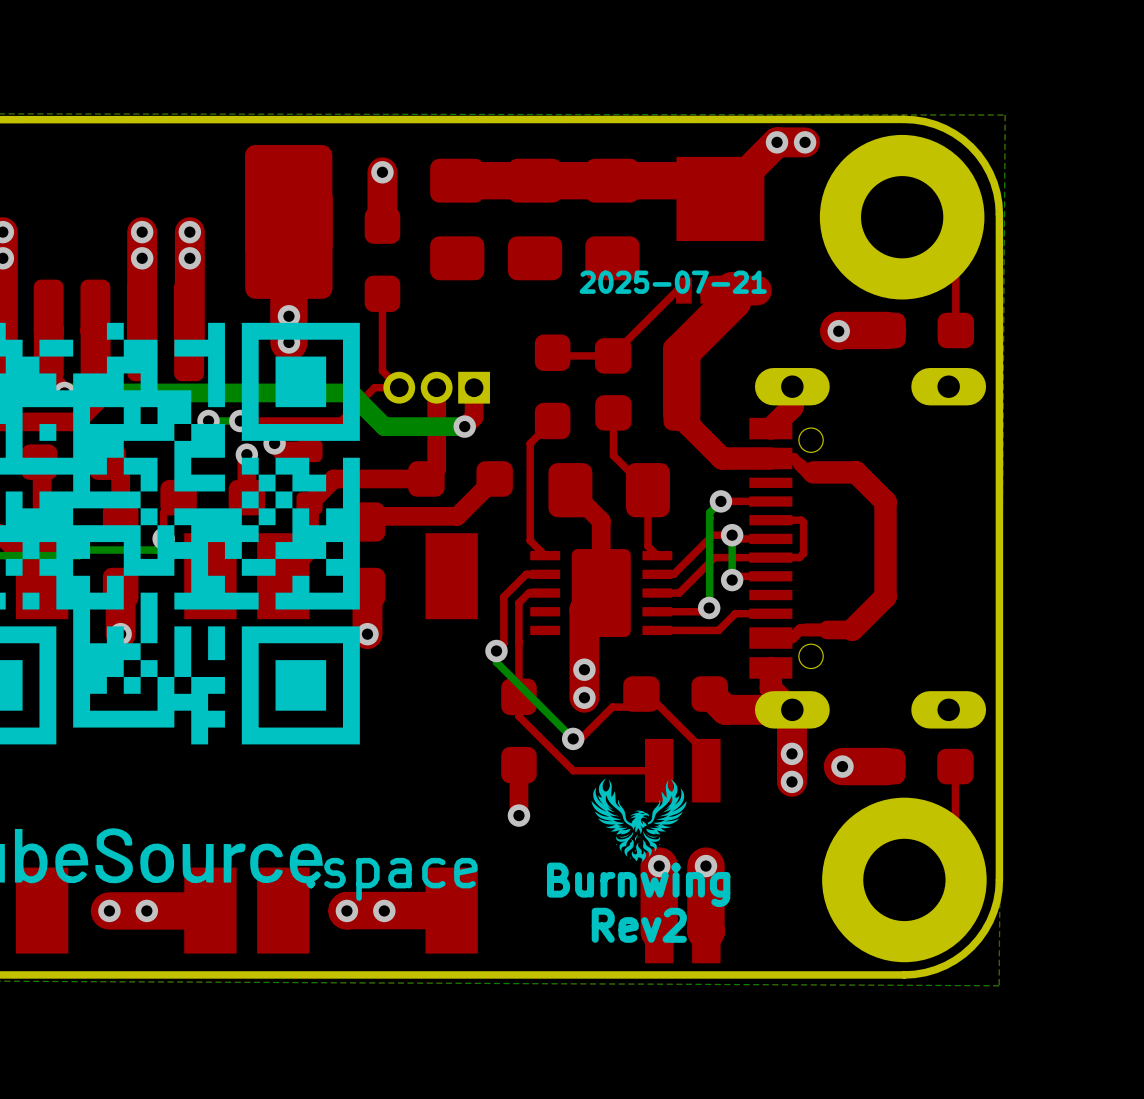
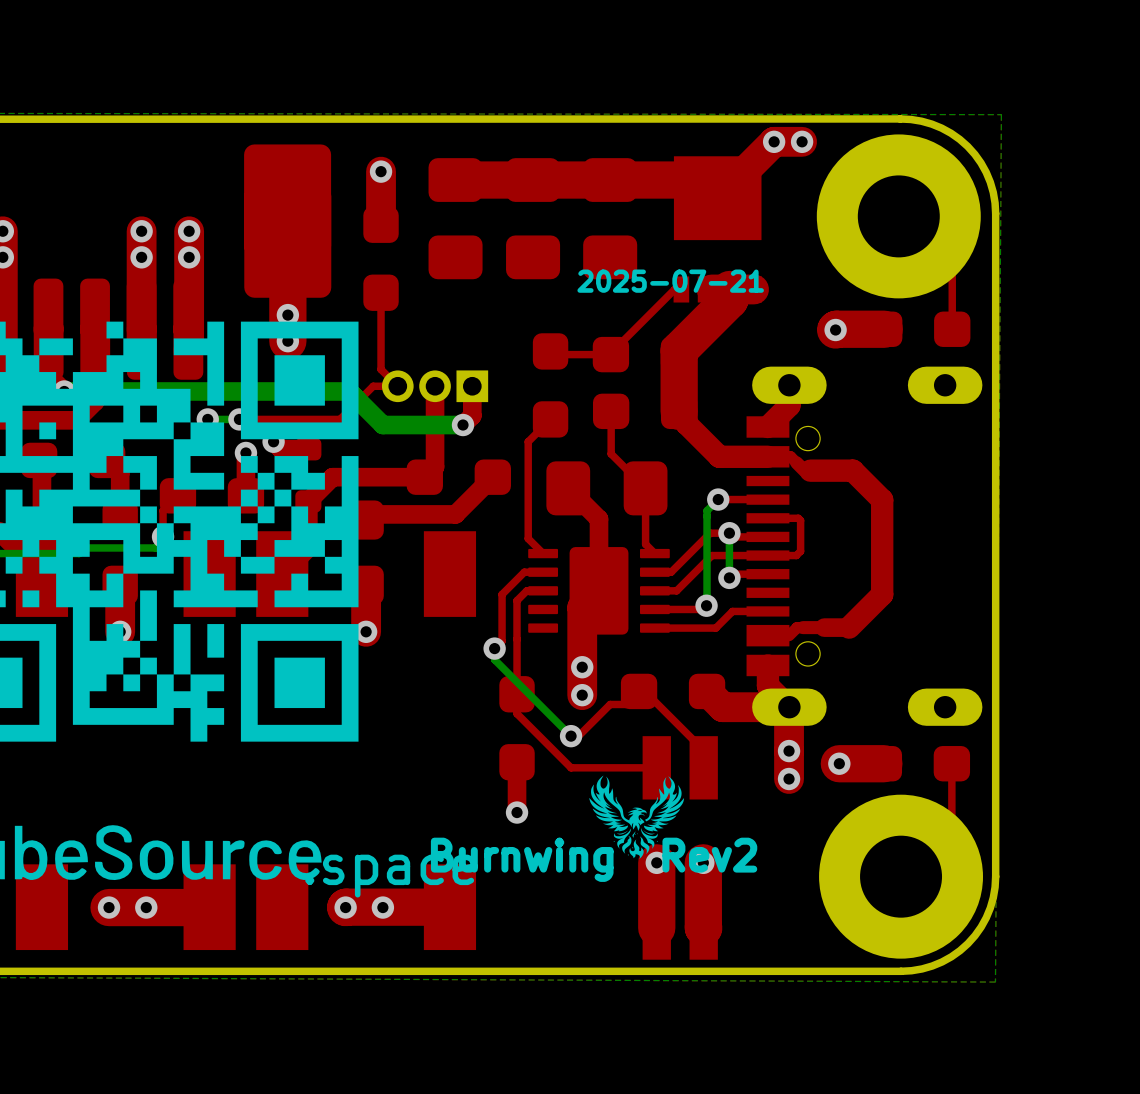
text: Burnwing (638, 884) -> Burnwing Rev2 (594, 859)
text: Rev2 (639, 925) -> none

